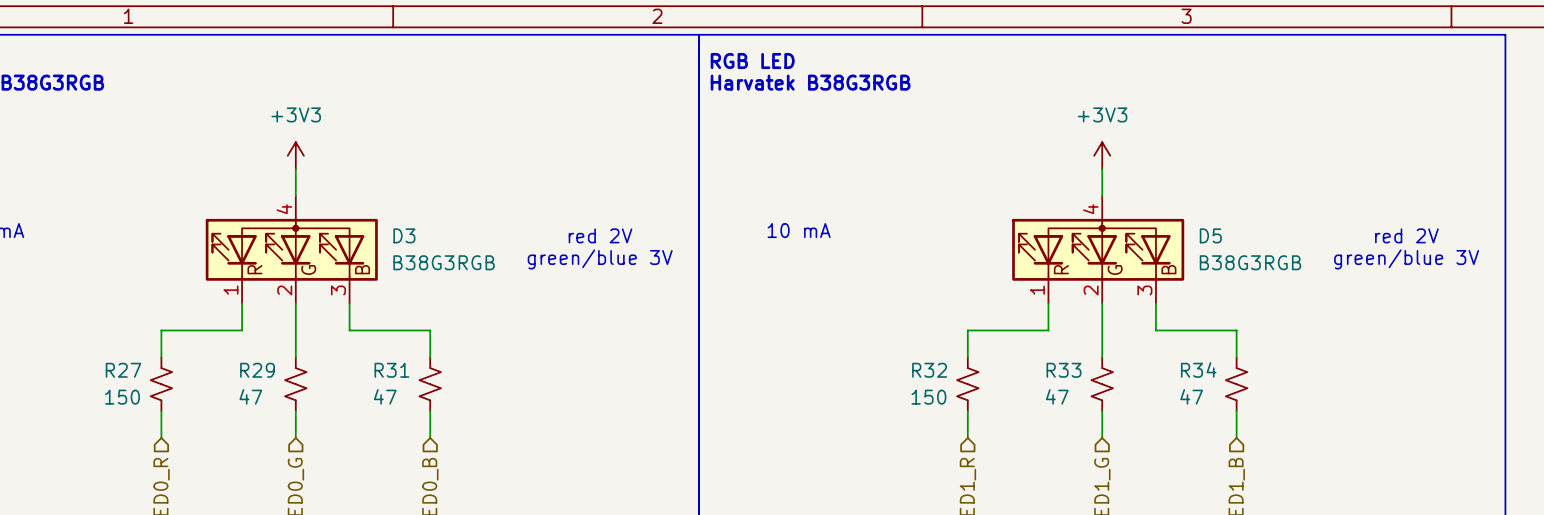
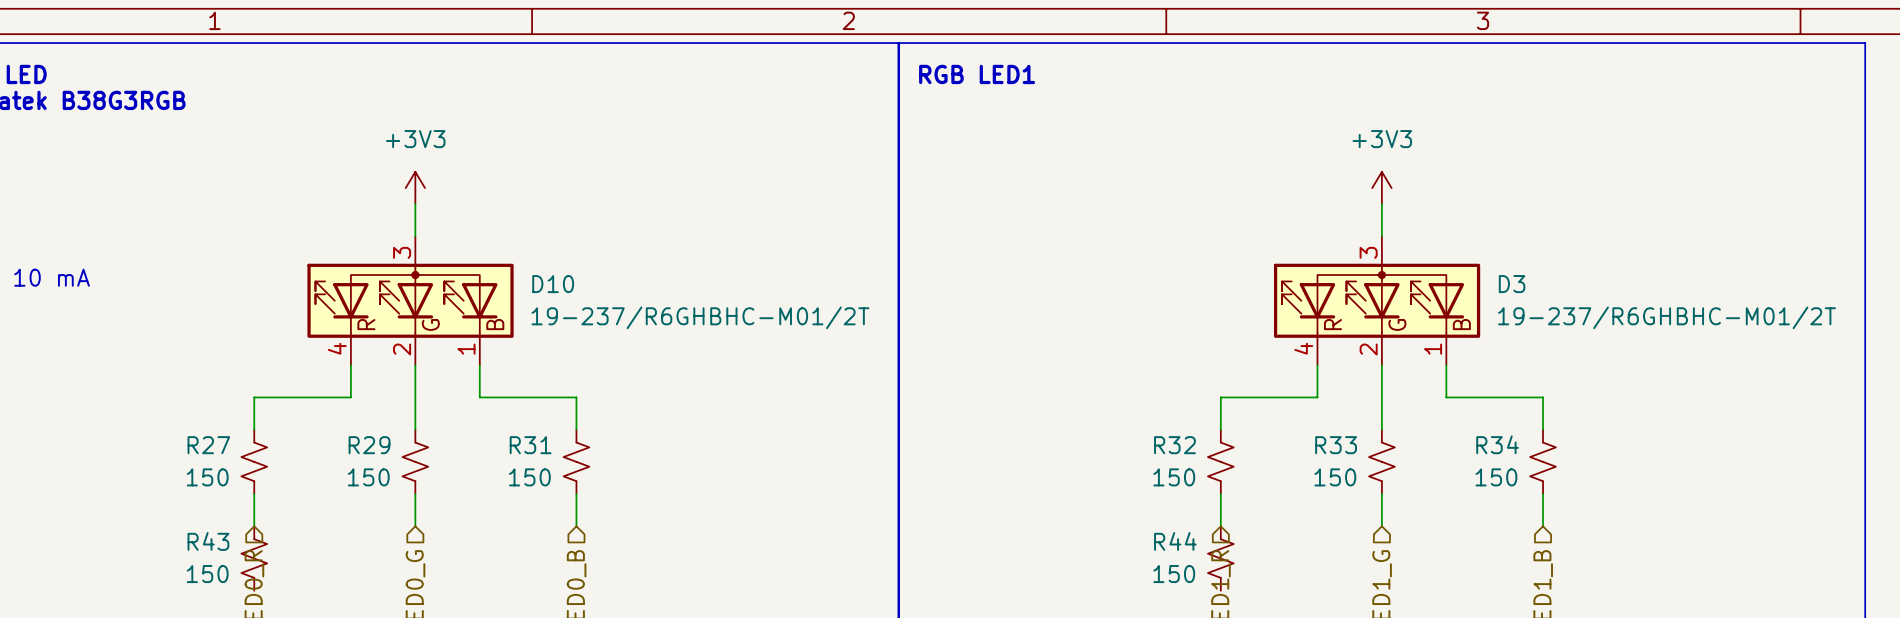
text: RGB LED (752, 61) -> RGB LED1 (977, 74)
text: Harvatek B38G3RGB (810, 82) -> none
D3 pin number: 4 (284, 209) -> 3 (1368, 252)
text: 10 mA (799, 230) -> none
text: red 2V (600, 235) -> none
text: red 2V (1406, 235) -> none
D3 position: (291, 249) -> (1377, 300)
D10: none -> 19-237/R6GHBHC-M01/2T (410, 300)
D5: B38G3RGB (1098, 249) -> none
text: green/blue 3V (600, 259) -> none
text: green/blue 3V (1406, 259) -> none
D3 value: B38G3RGB (444, 262) -> 19-237/R6GHBHC-M01/2T (1667, 317)
D3 pin number: 1 (230, 290) -> 4 (1303, 348)
D3 pin number: 3 (338, 290) -> 1 (1433, 349)
R29 value: 47 (250, 396) -> 150 (368, 477)
R31 value: 47 (385, 396) -> 150 (529, 477)
R33 value: 47 (1057, 396) -> 150 (1335, 477)
R34 value: 47 (1191, 396) -> 150 (1496, 477)
R43: none -> 150 (254, 558)
R44: none -> 150 (1220, 558)

